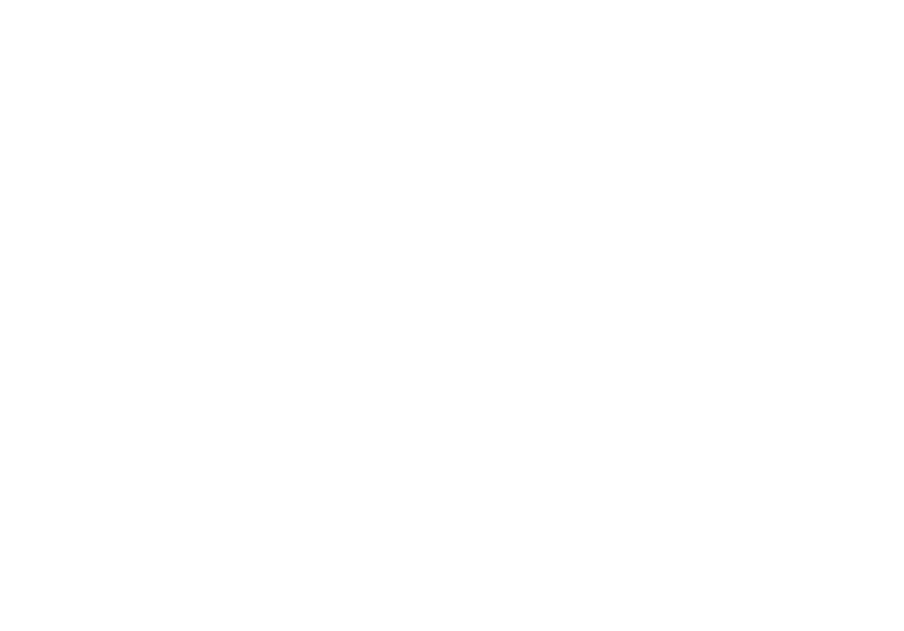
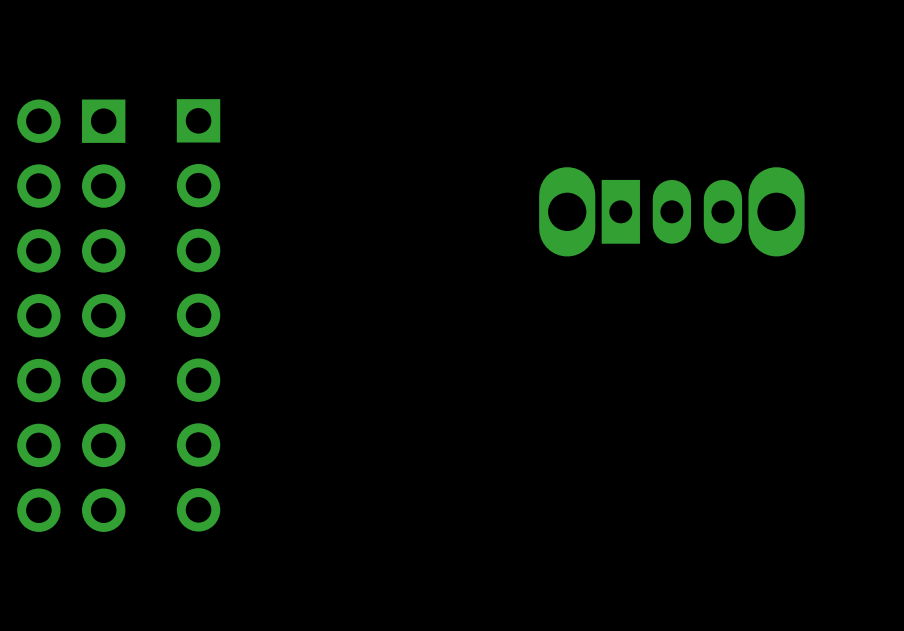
part: none -> (671, 211)
part: none -> (71, 315)
part: none -> (198, 315)

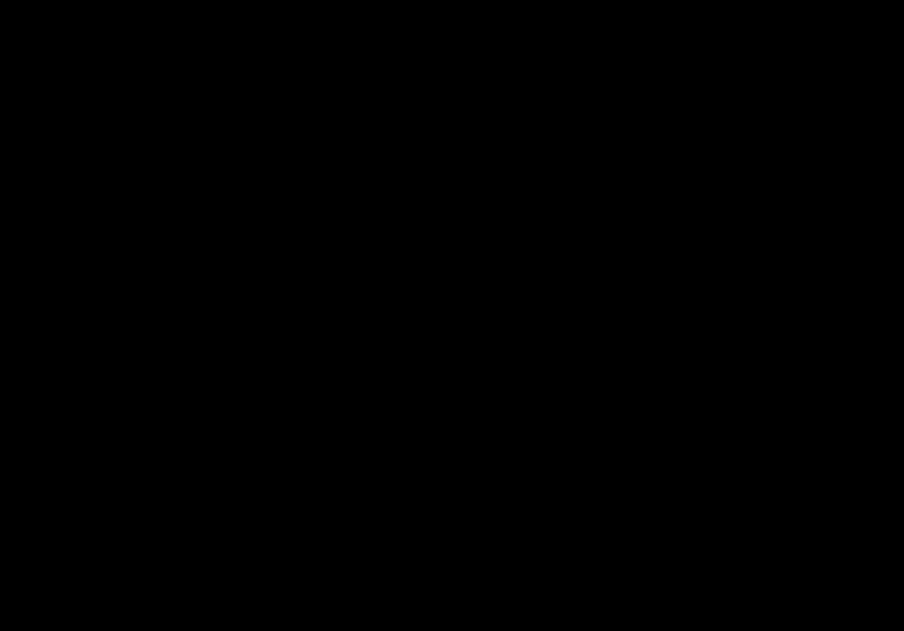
part: (671, 211) -> none
part: (71, 315) -> none
part: (198, 315) -> none

